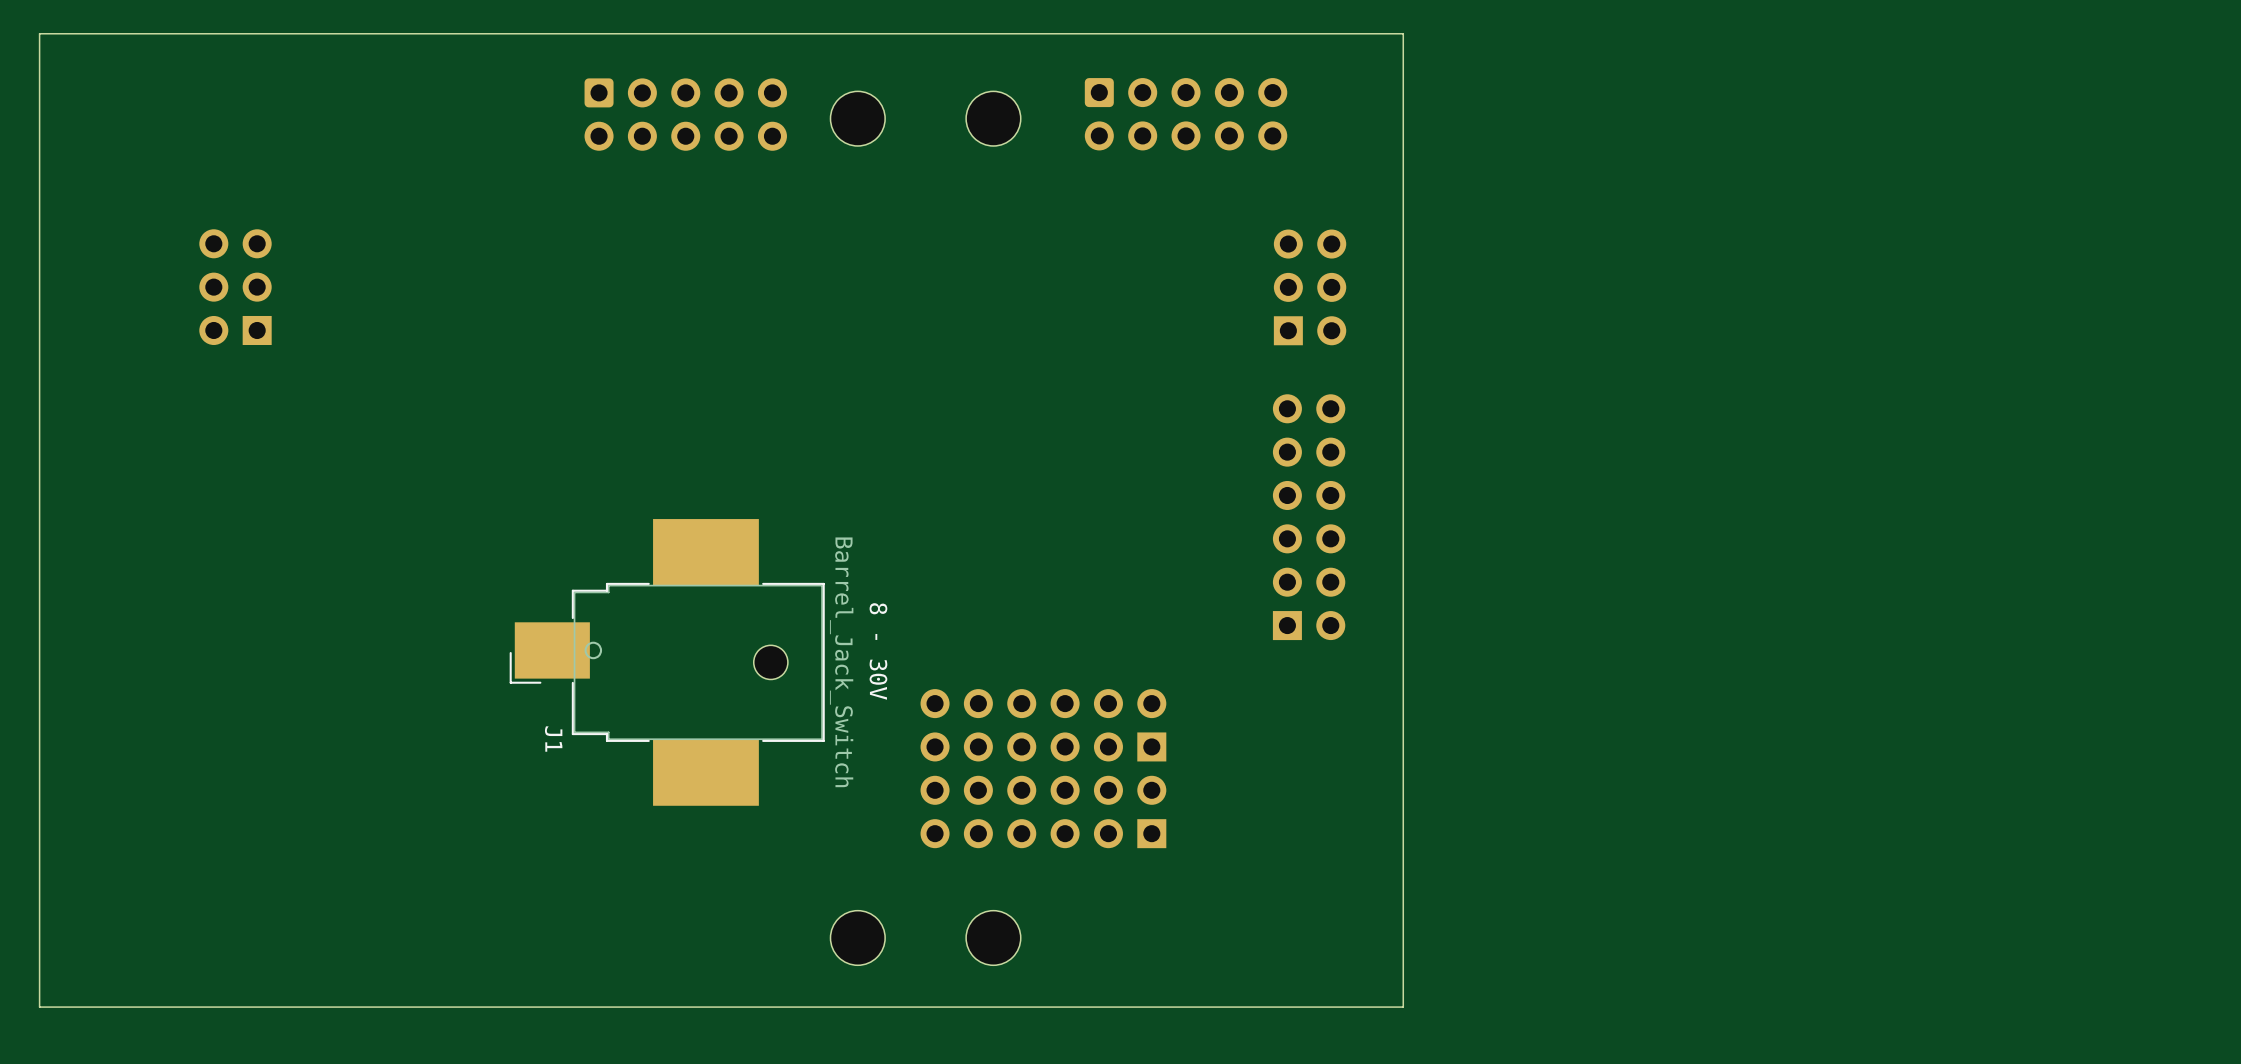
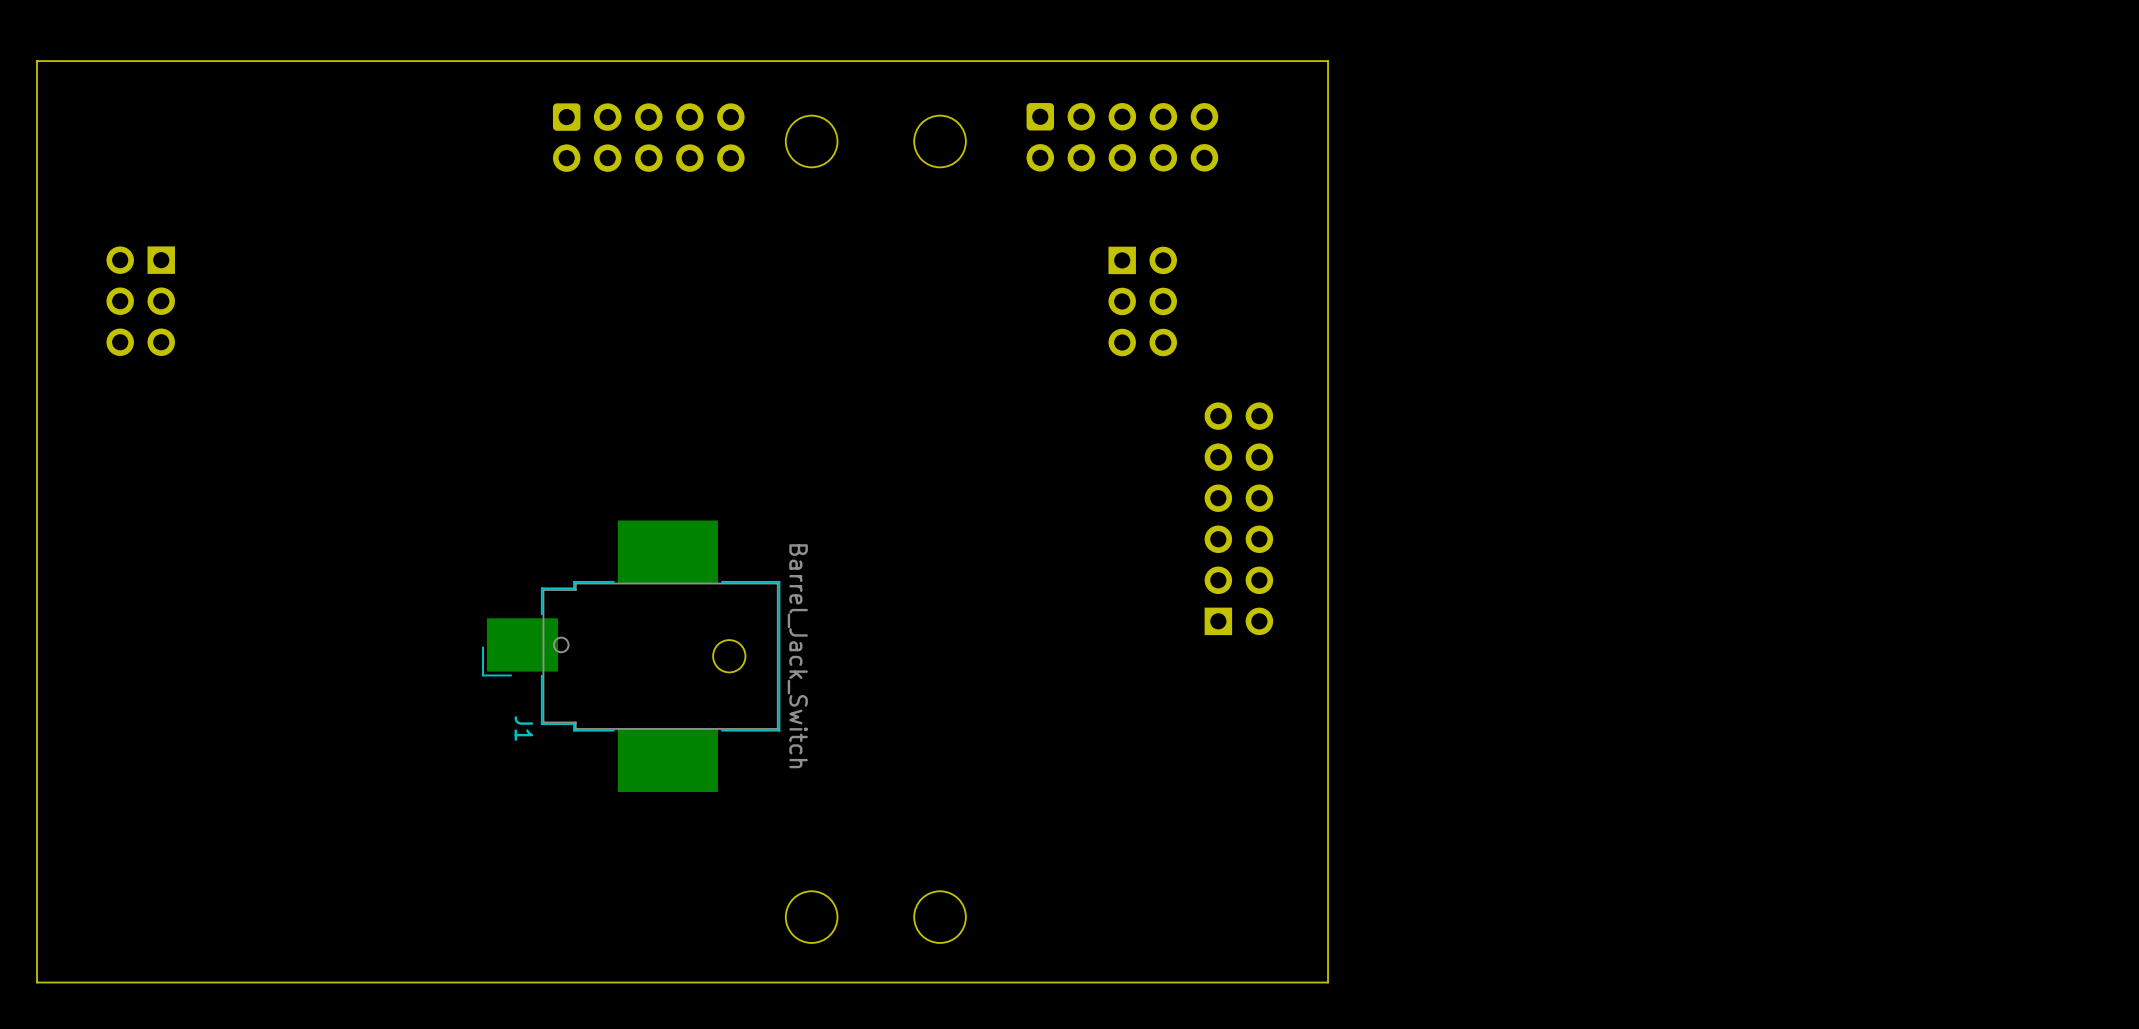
part: none -> (140, 301)
part: (235, 287) -> none
part: none -> (1142, 301)
part: (1310, 287) -> none
text: 8 - 30V (878, 651) -> none
part: (1043, 725) -> none
part: (1043, 811) -> none

